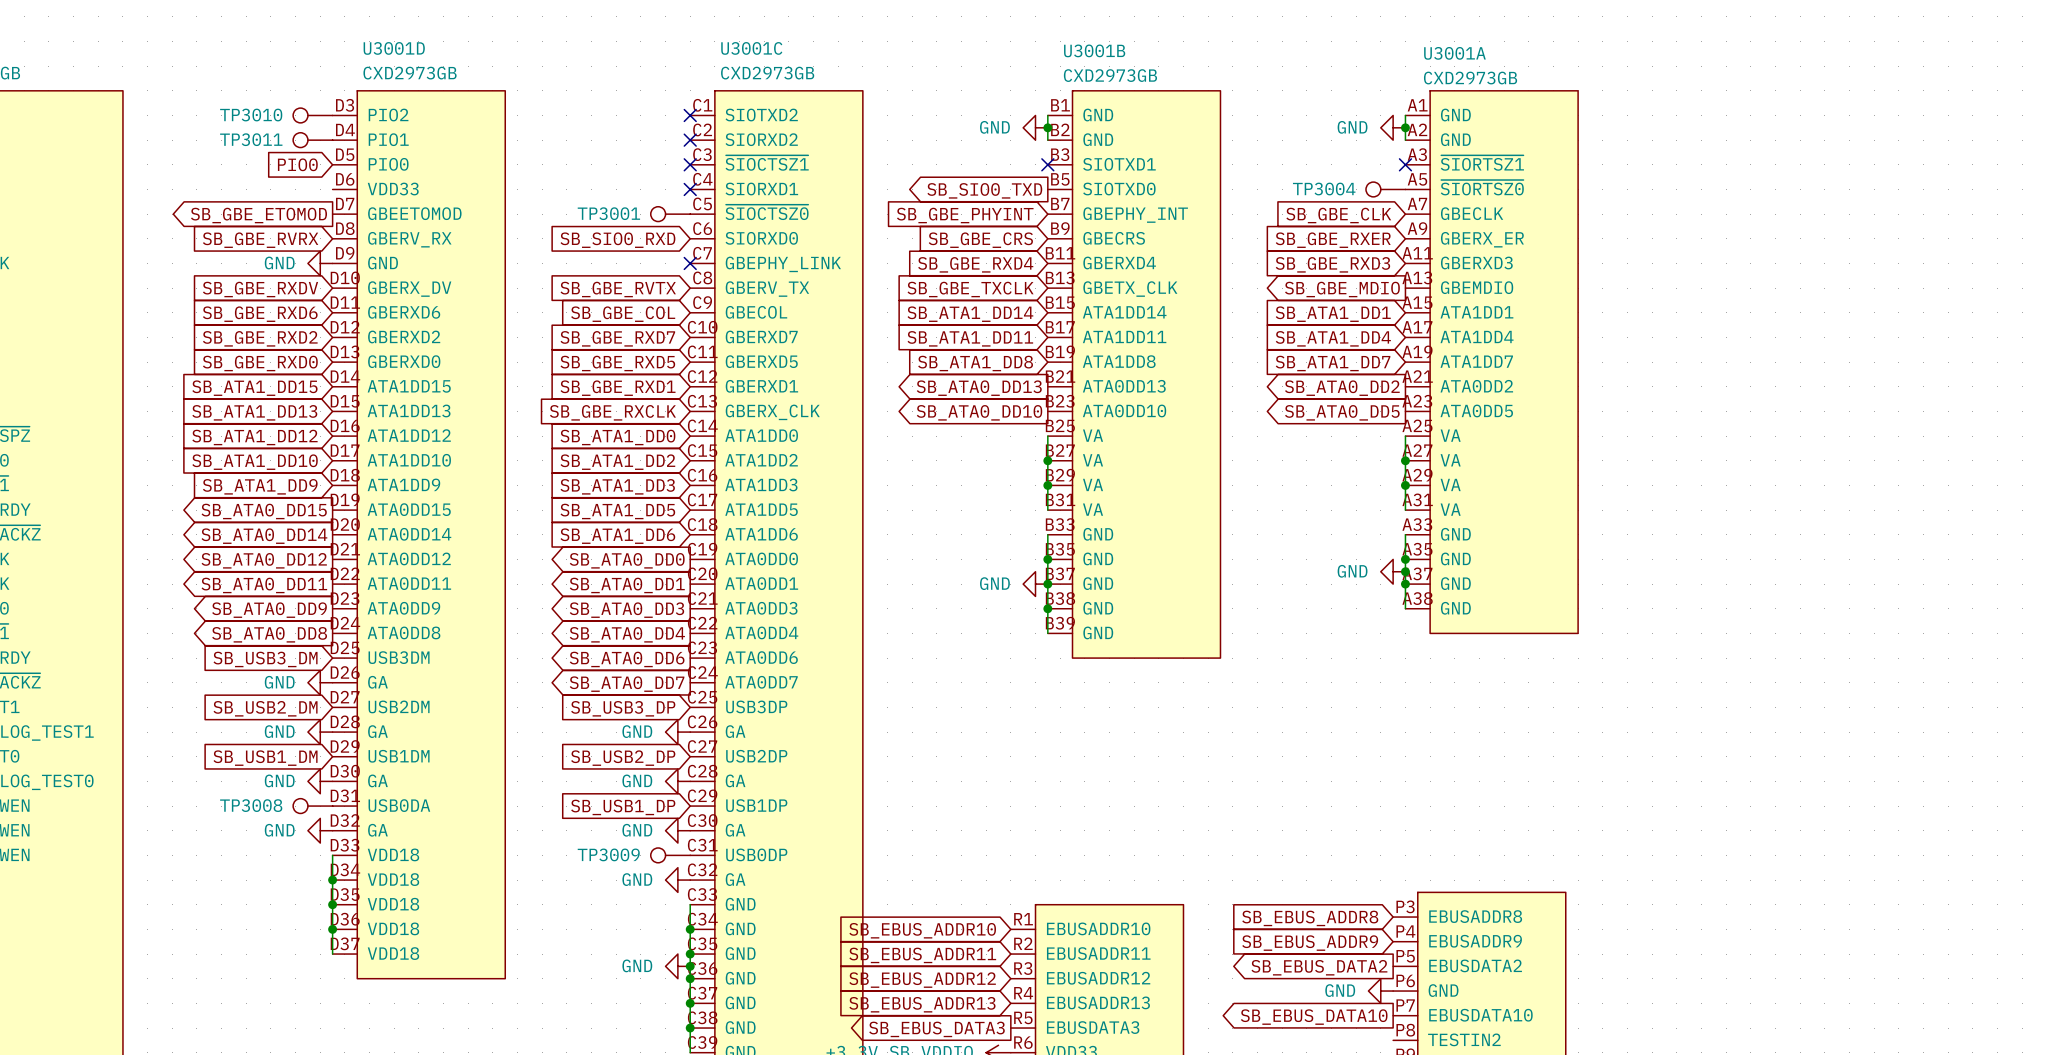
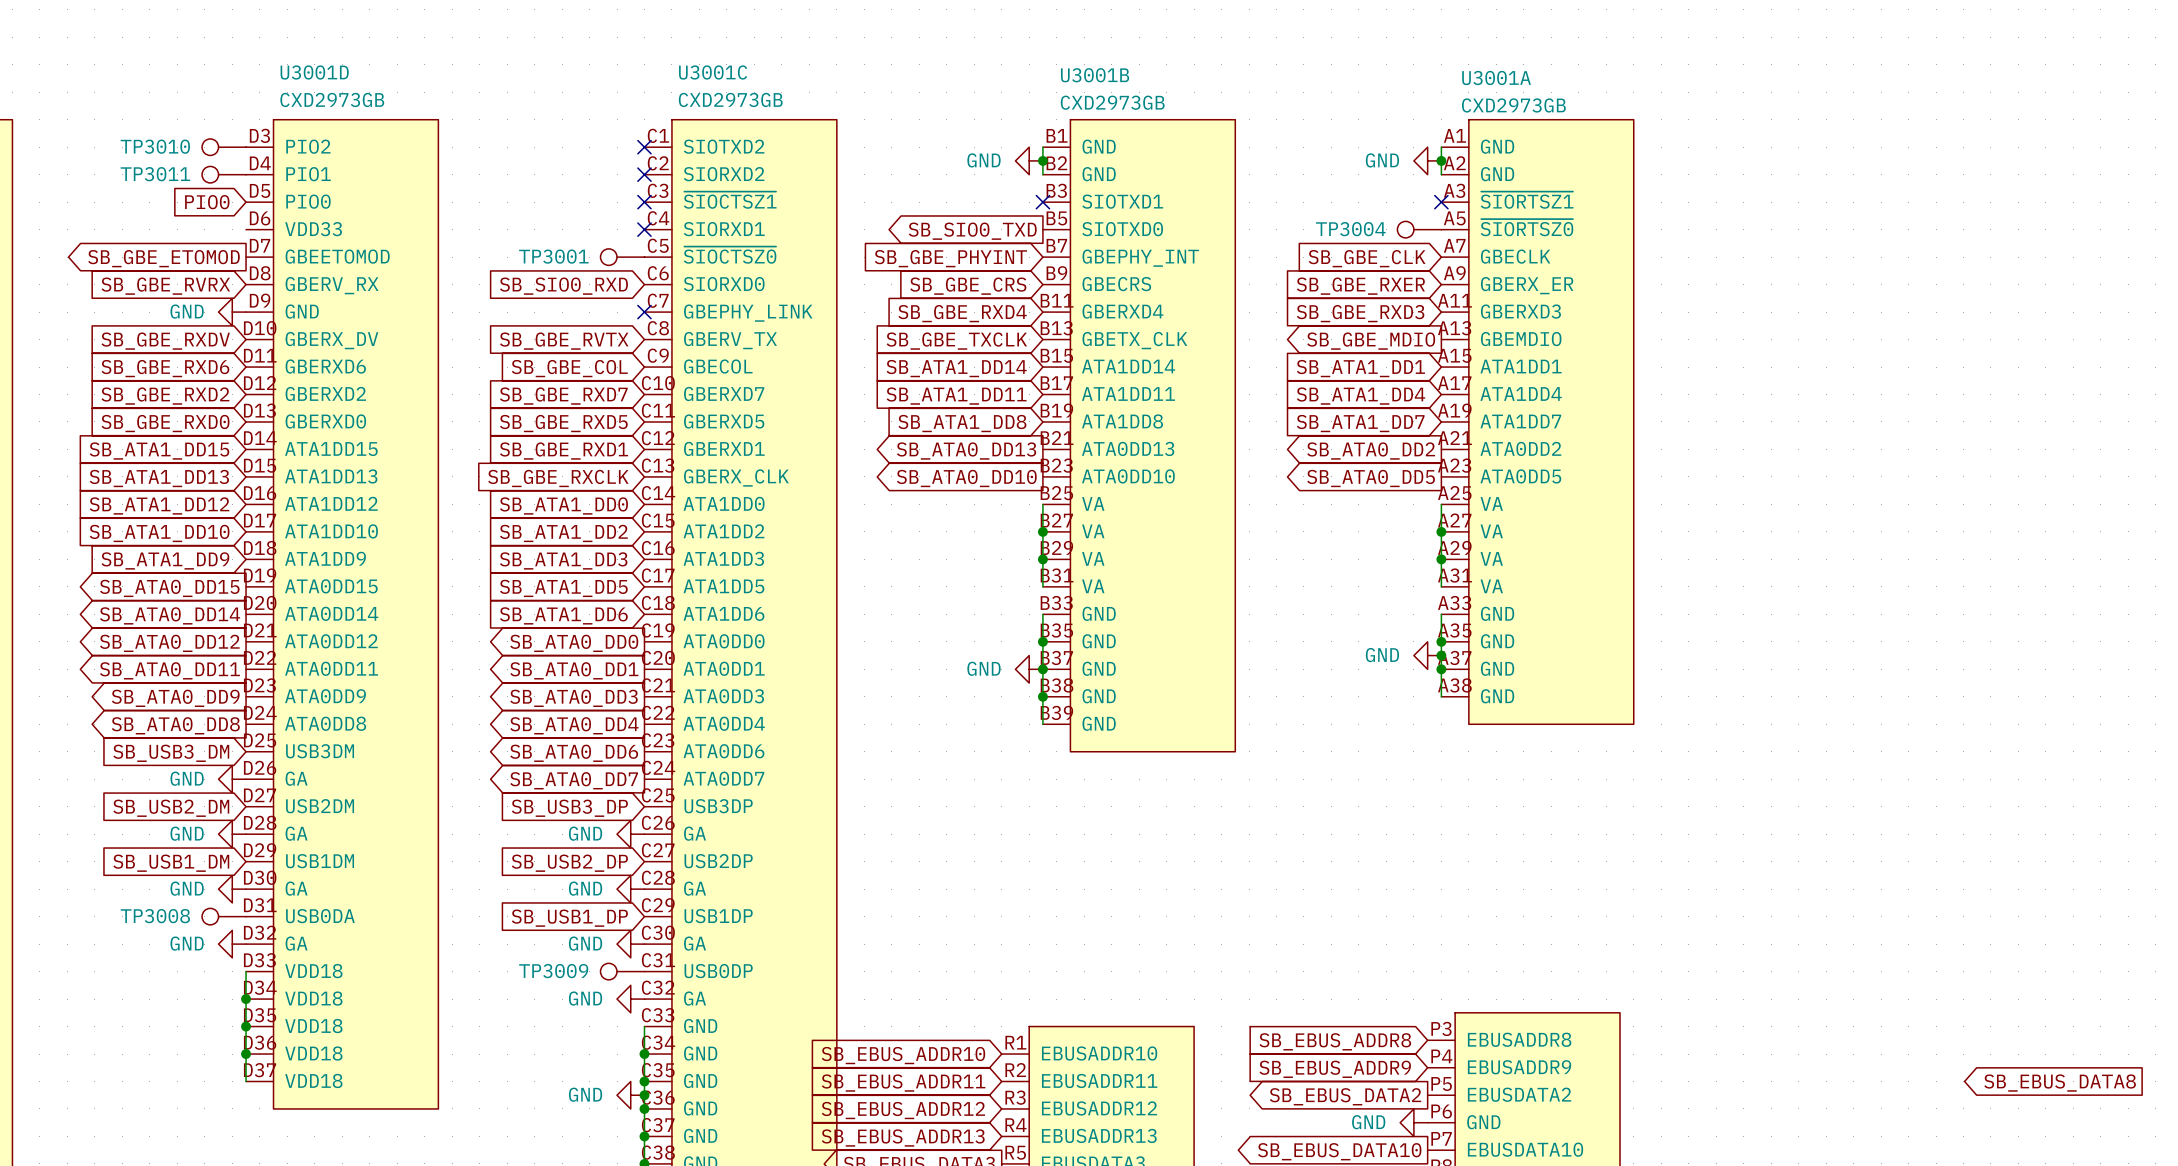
global label: none -> SB_EBUS_DATA8 (2060, 1083)

